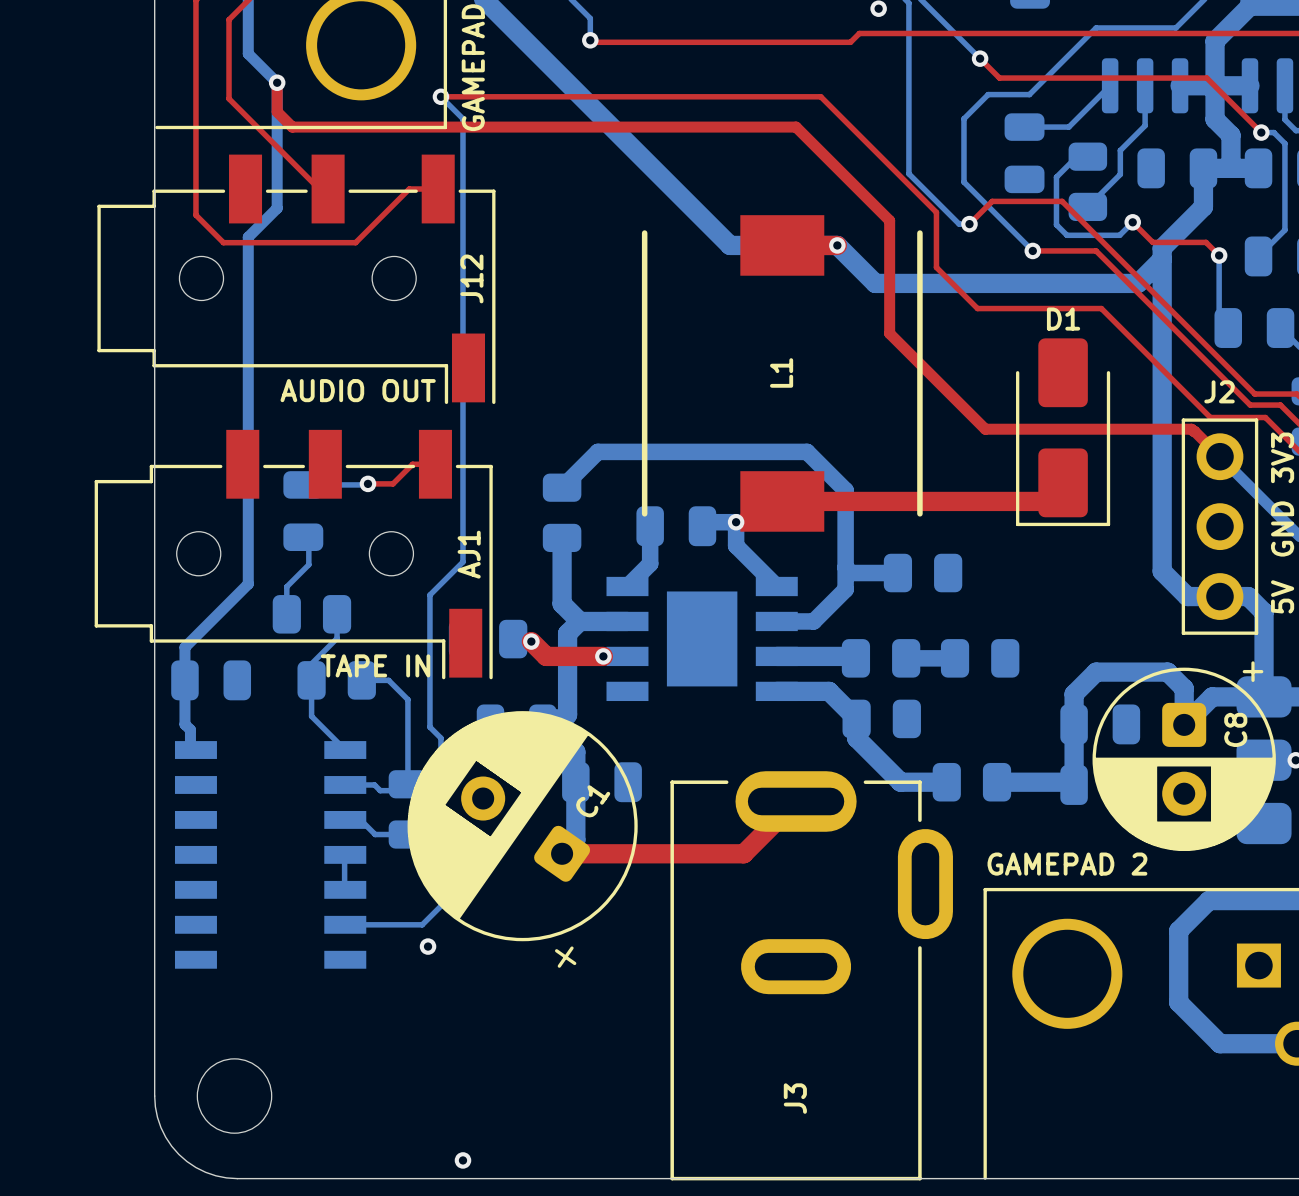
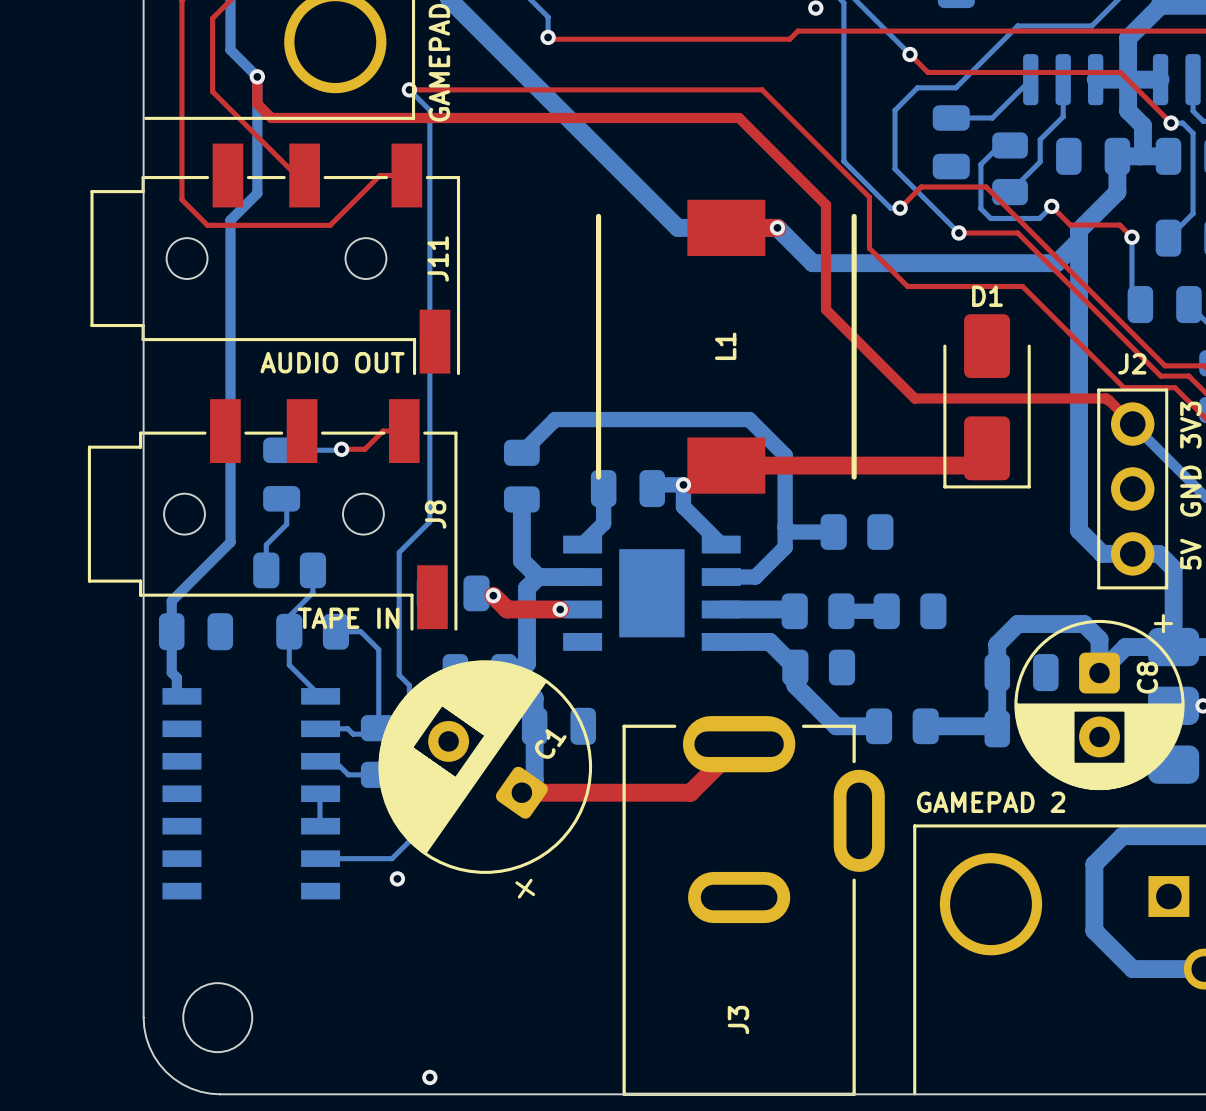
J12 name: J12 (471, 278) -> J11 (438, 258)
AJ1 name: AJ1 (469, 554) -> J8 (435, 514)

